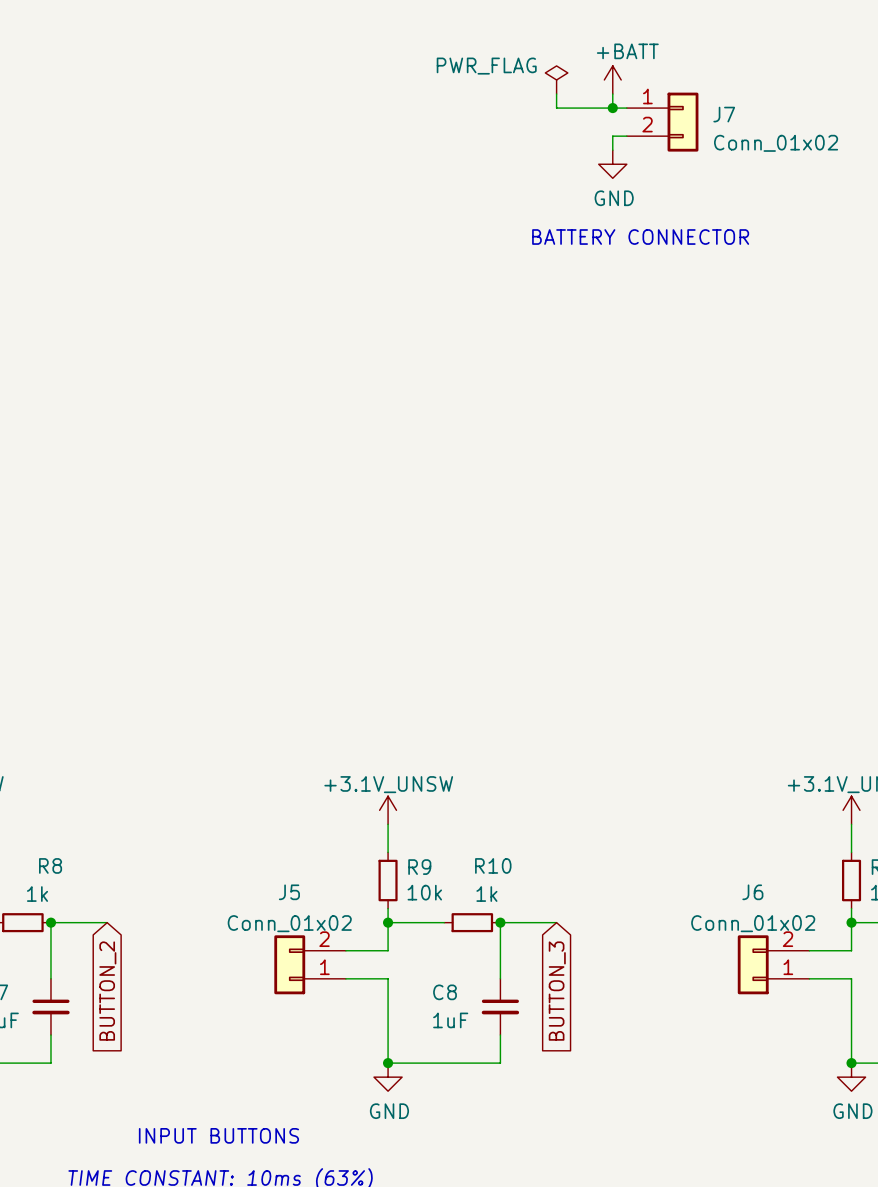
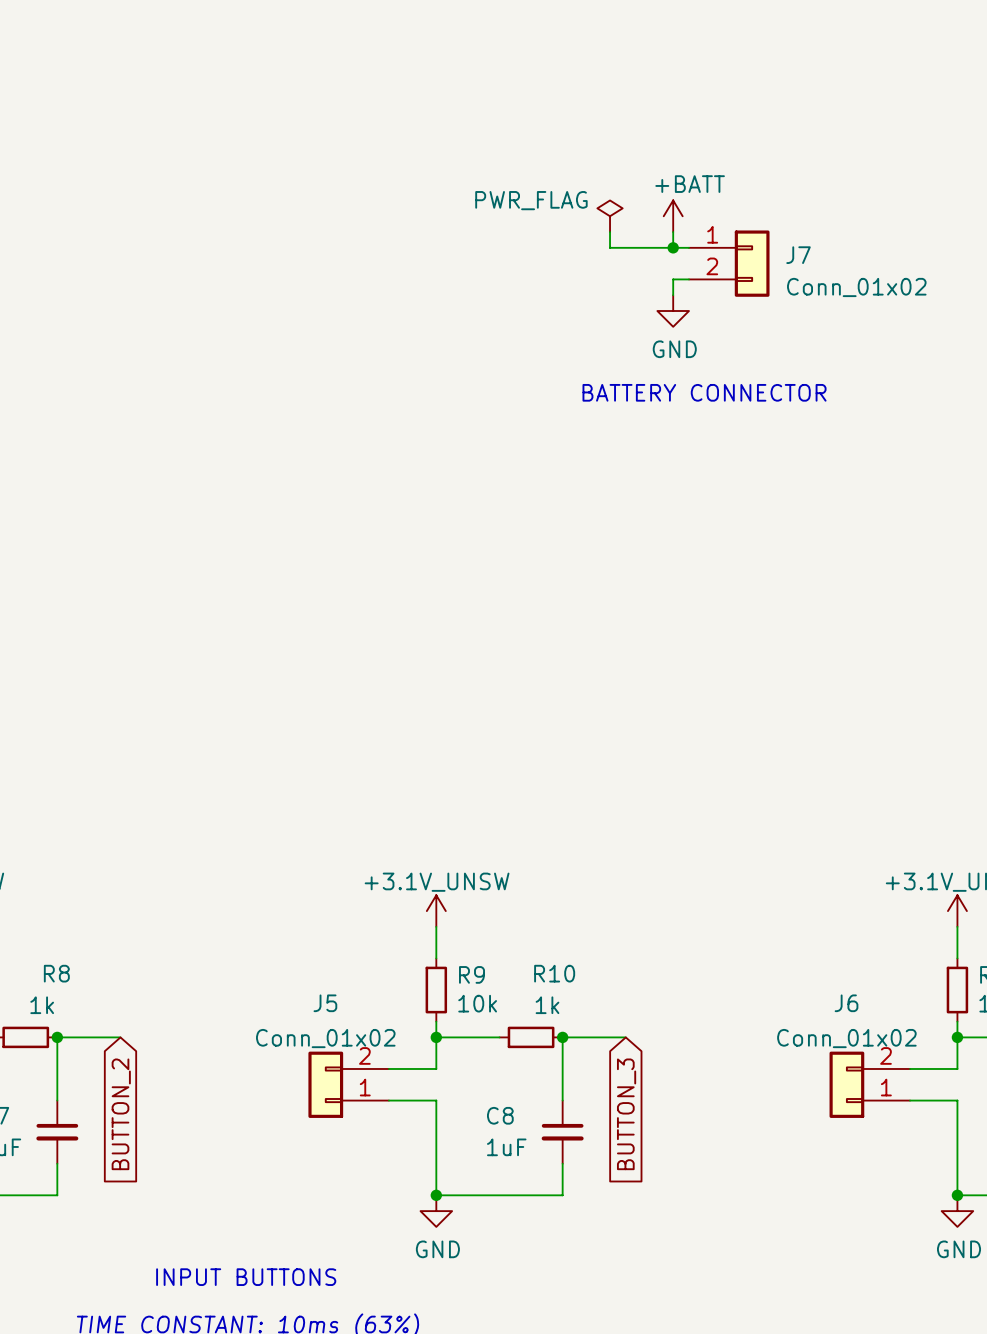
power symbol position: PWR_FLAG (556, 79) -> PWR_FLAG (610, 216)
power symbol position: +BATT (612, 79) -> +BATT (673, 216)
wire: (556, 94) (556, 108) (626, 108) -> (610, 232) (610, 247) (688, 247)
wire: (612, 94) (612, 108) -> (673, 232) (673, 247)
junction: (612, 108) -> none
J7 position: (662, 122) -> (729, 263)
wire: (626, 136) (612, 136) (612, 150) -> (688, 279) (673, 279) (673, 295)
power symbol position: GND (612, 164) -> GND (673, 311)
junction: none -> (673, 247)
text position: BATTERY CONNECTOR (640, 237) -> BATTERY CONNECTOR (704, 392)

